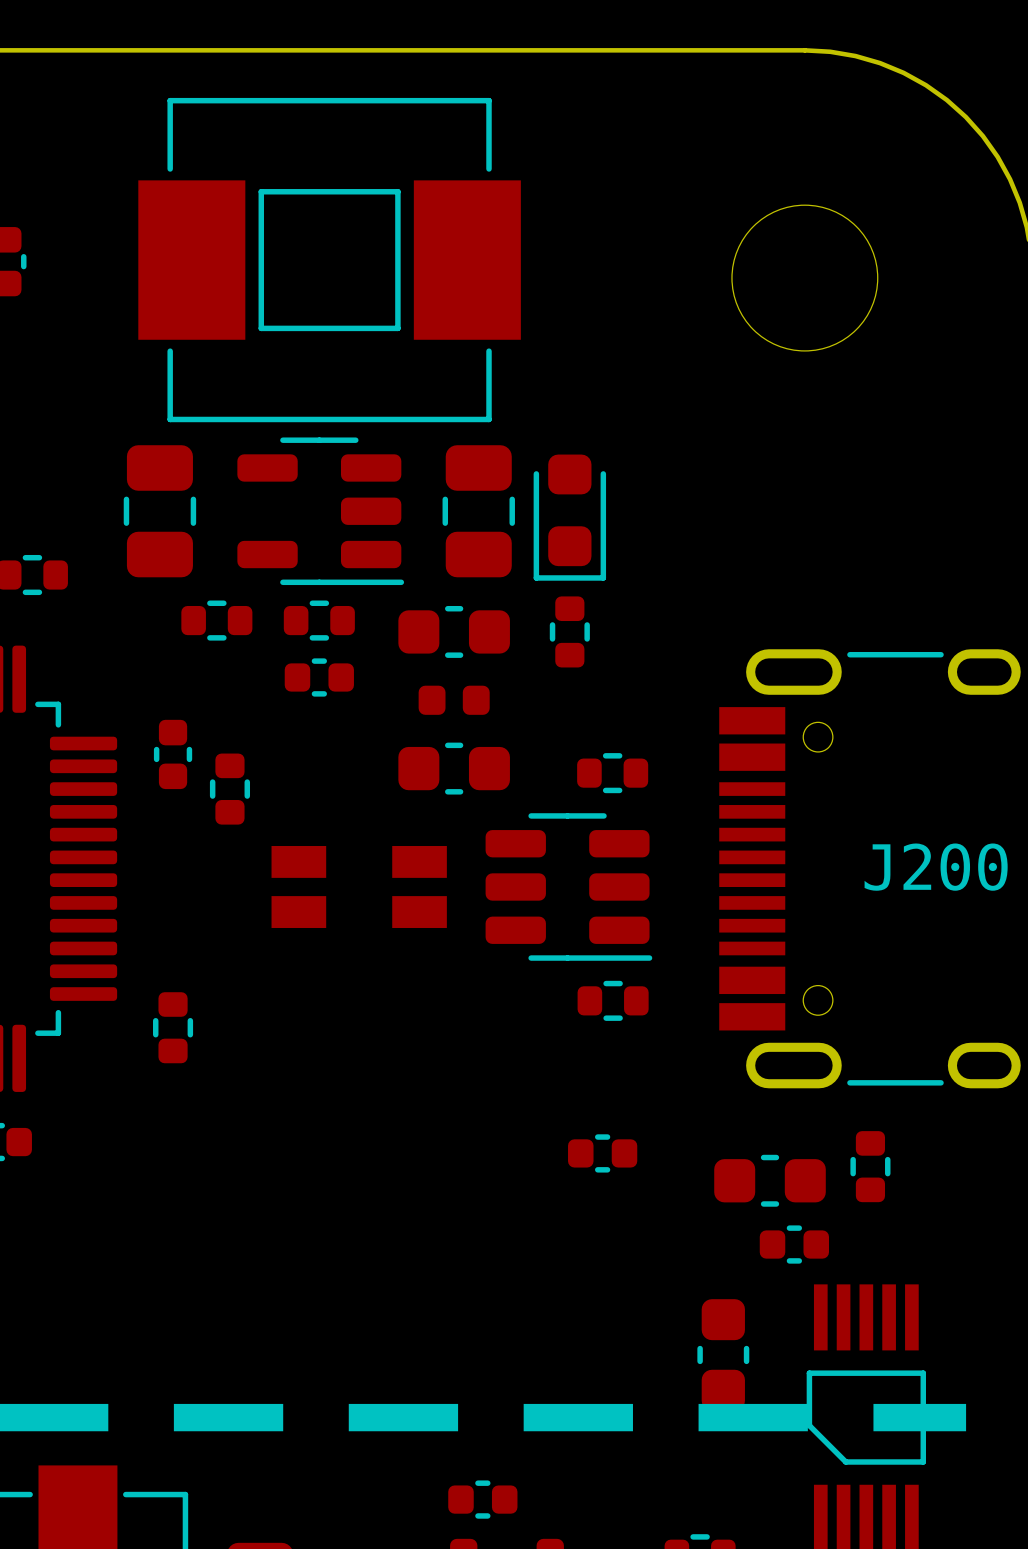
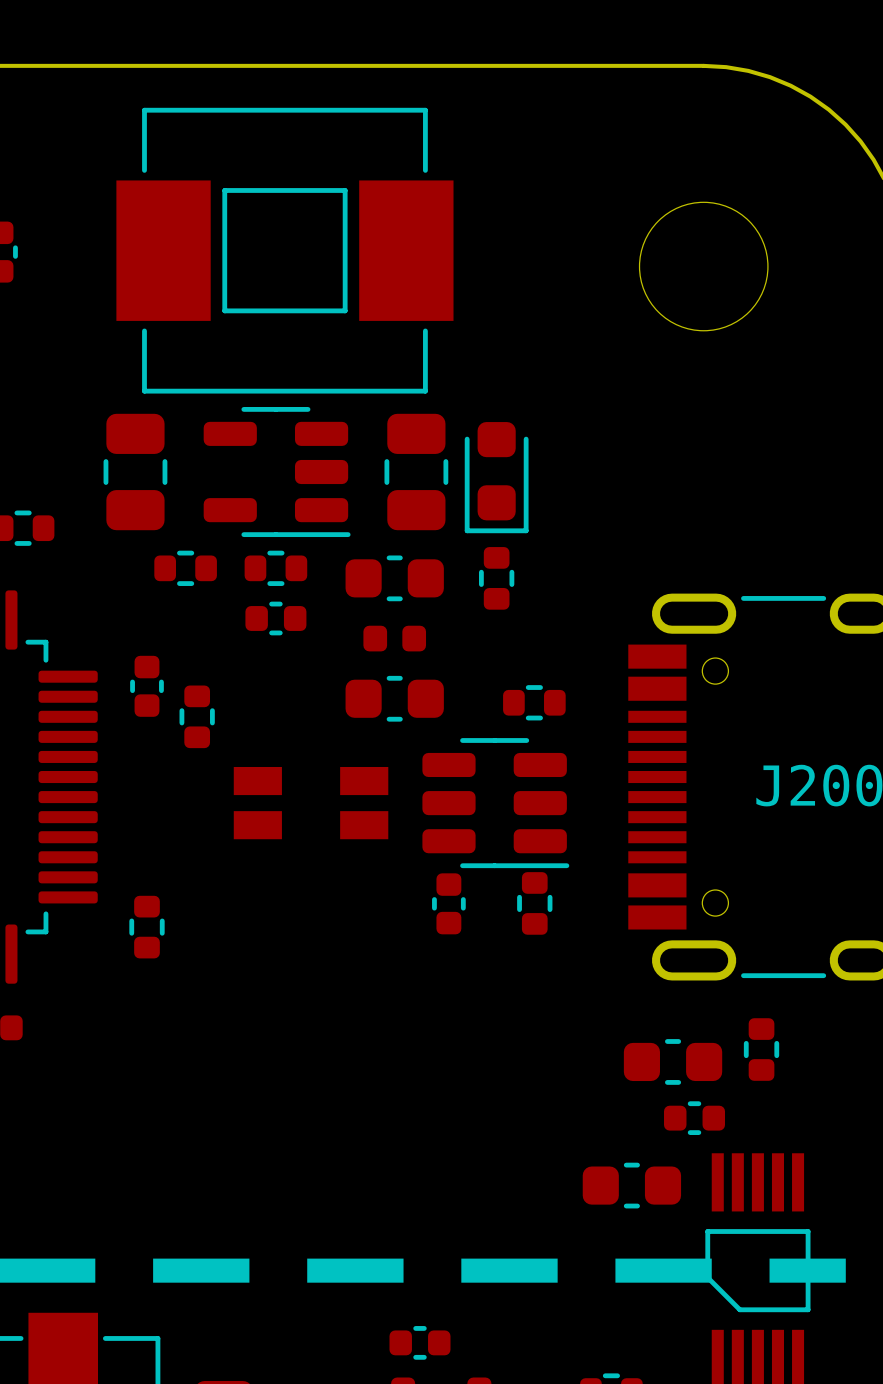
part rotation: 0° (613, 1000) -> 90° clockwise (534, 903)
part rotation: 0° (602, 1153) -> 90° clockwise (448, 903)
part position: (602, 1153) -> (448, 903)
part rotation: 0° (723, 1354) -> 90° clockwise (631, 1185)

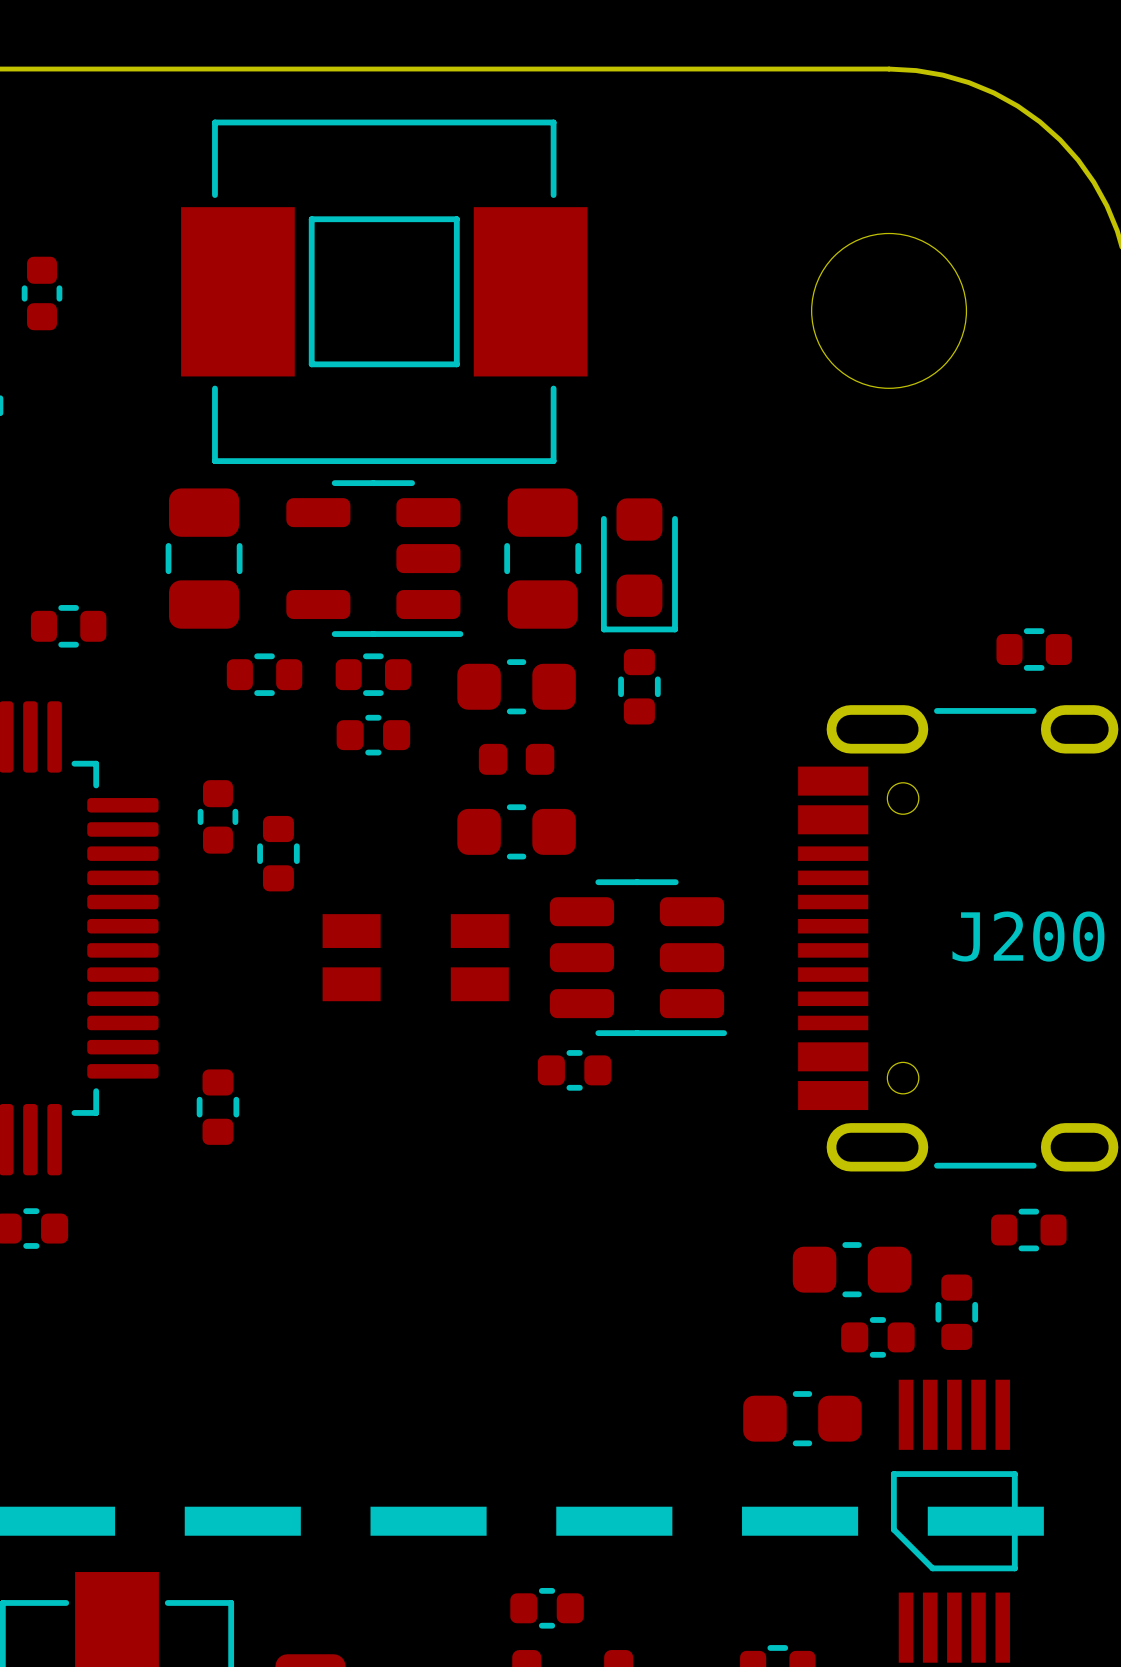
part: none -> (1034, 649)
part: (534, 702) -> none
part rotation: 0° (448, 903) -> 90° clockwise (574, 1070)
part: (534, 903) -> none
part: none -> (1028, 1230)
part: (761, 1049) -> none
part: none -> (956, 1312)

